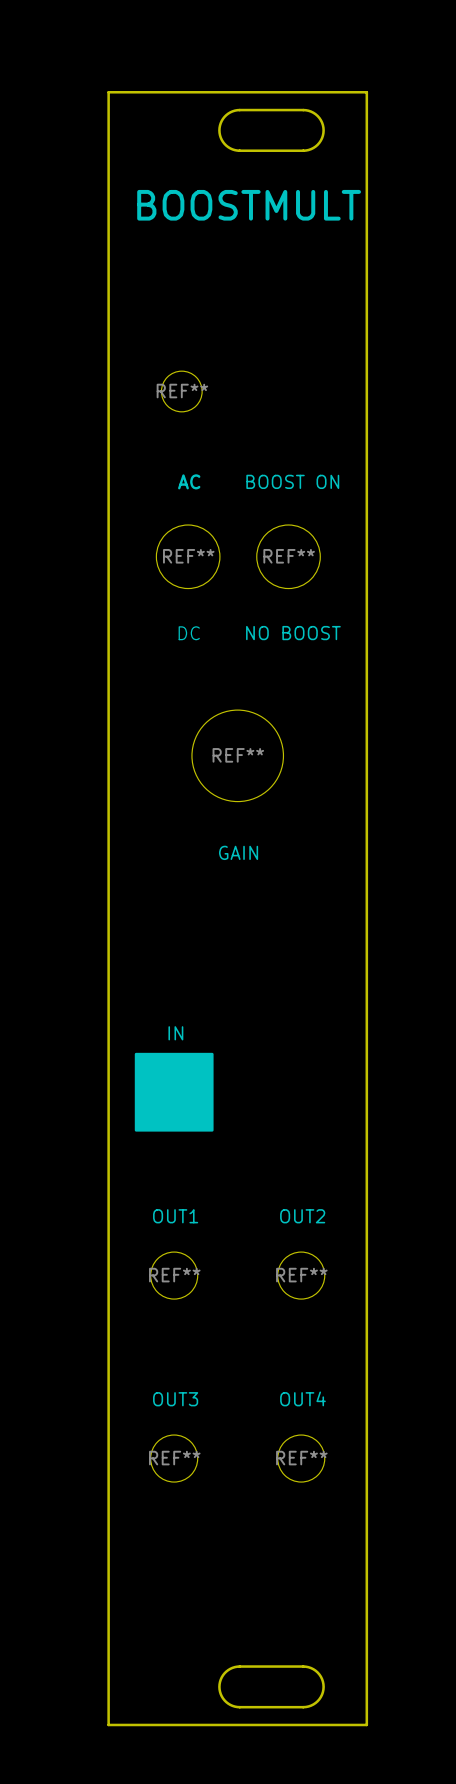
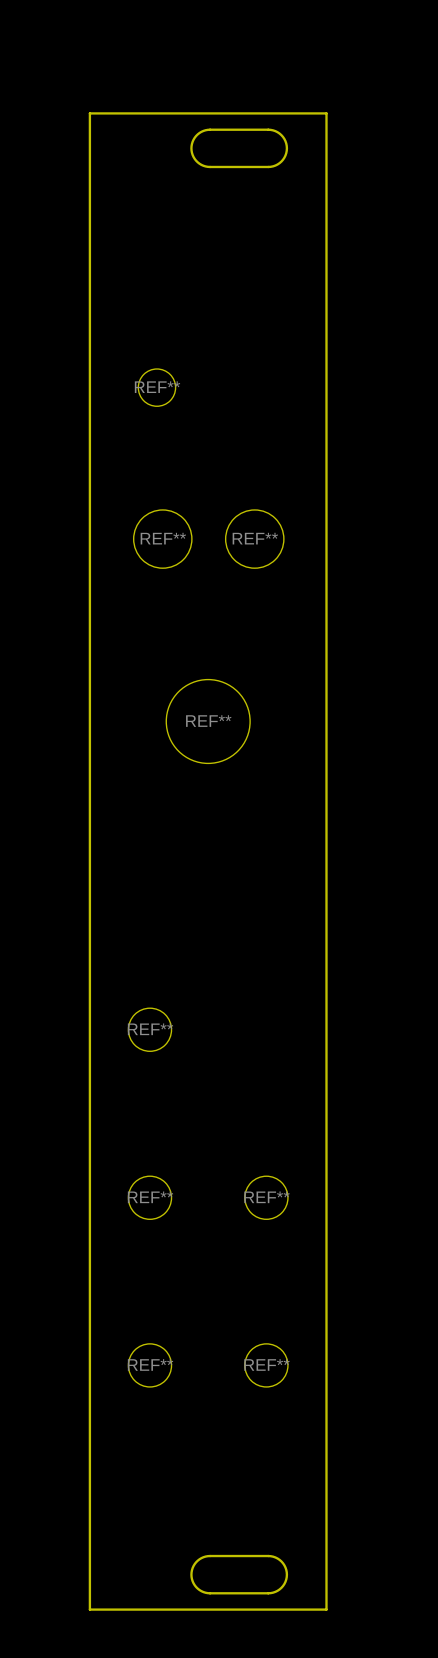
text: BOOSTMULT (249, 205) -> none
text: AC (189, 481) -> none
text: BOOST ON (292, 481) -> none
text: DC (189, 633) -> none
text: NO BOOST (293, 633) -> none
text: GAIN (238, 852) -> none
text: IN (175, 1033) -> none
drawing: [134, 1052, 214, 1132] -> none
text: OUT1 (175, 1216) -> none
text: OUT2 (302, 1216) -> none
text: OUT4 (302, 1398) -> none
text: OUT3 (175, 1399) -> none

